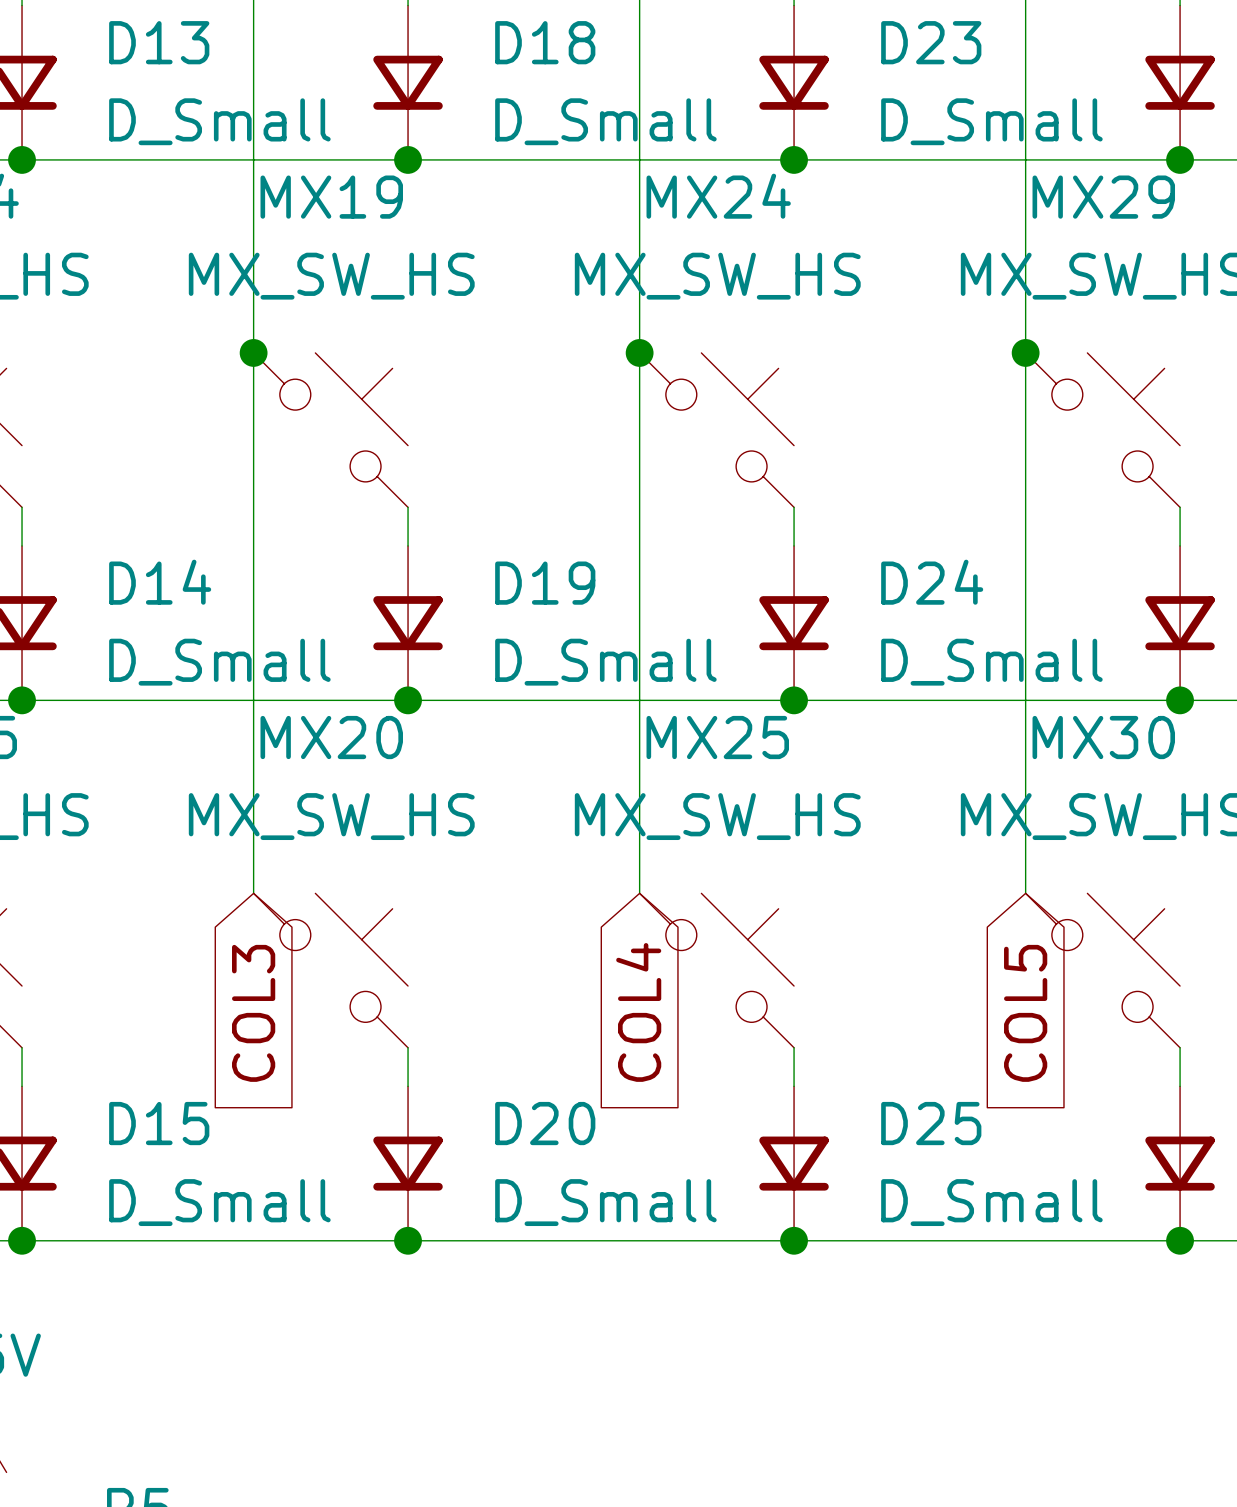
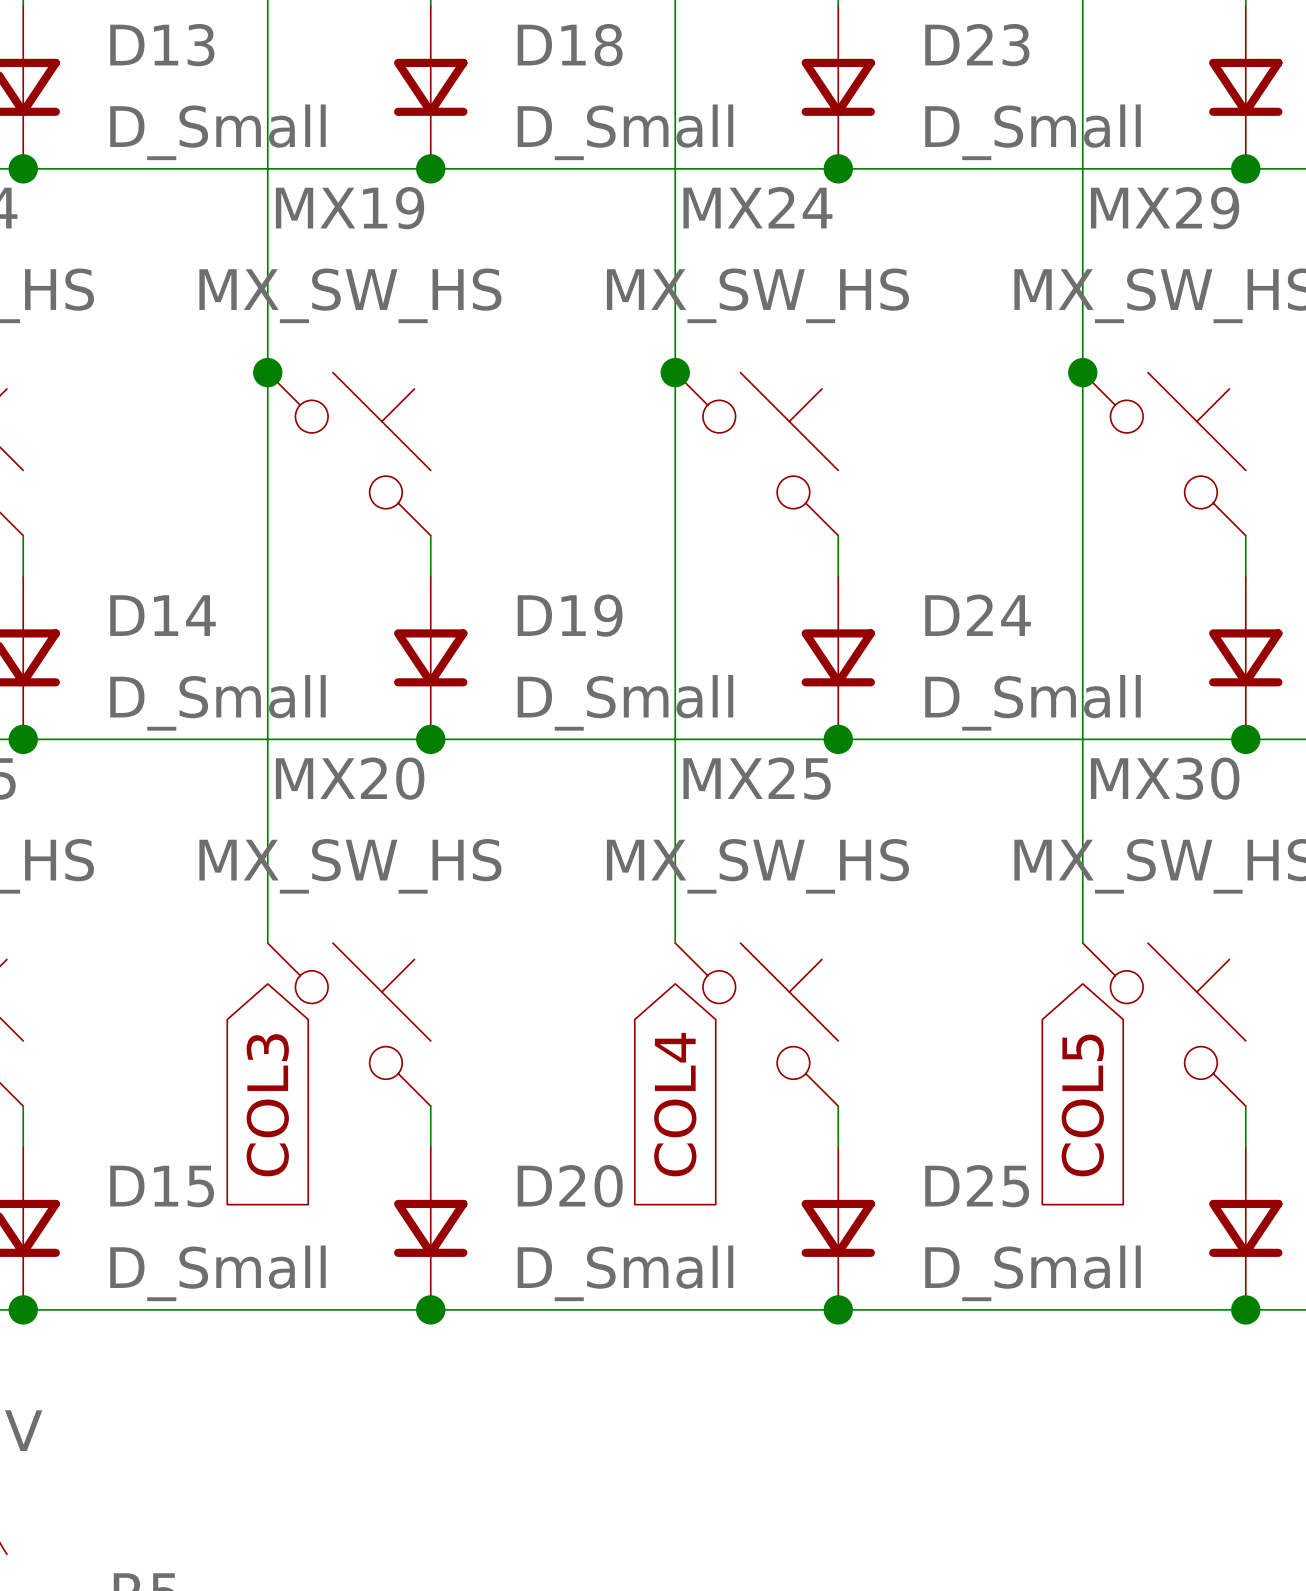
global label position: COL4 (638, 1012) -> COL4 (675, 1104)
global label position: COL3 (253, 1013) -> COL3 (267, 1105)
global label position: COL5 (1025, 1013) -> COL5 (1082, 1105)

